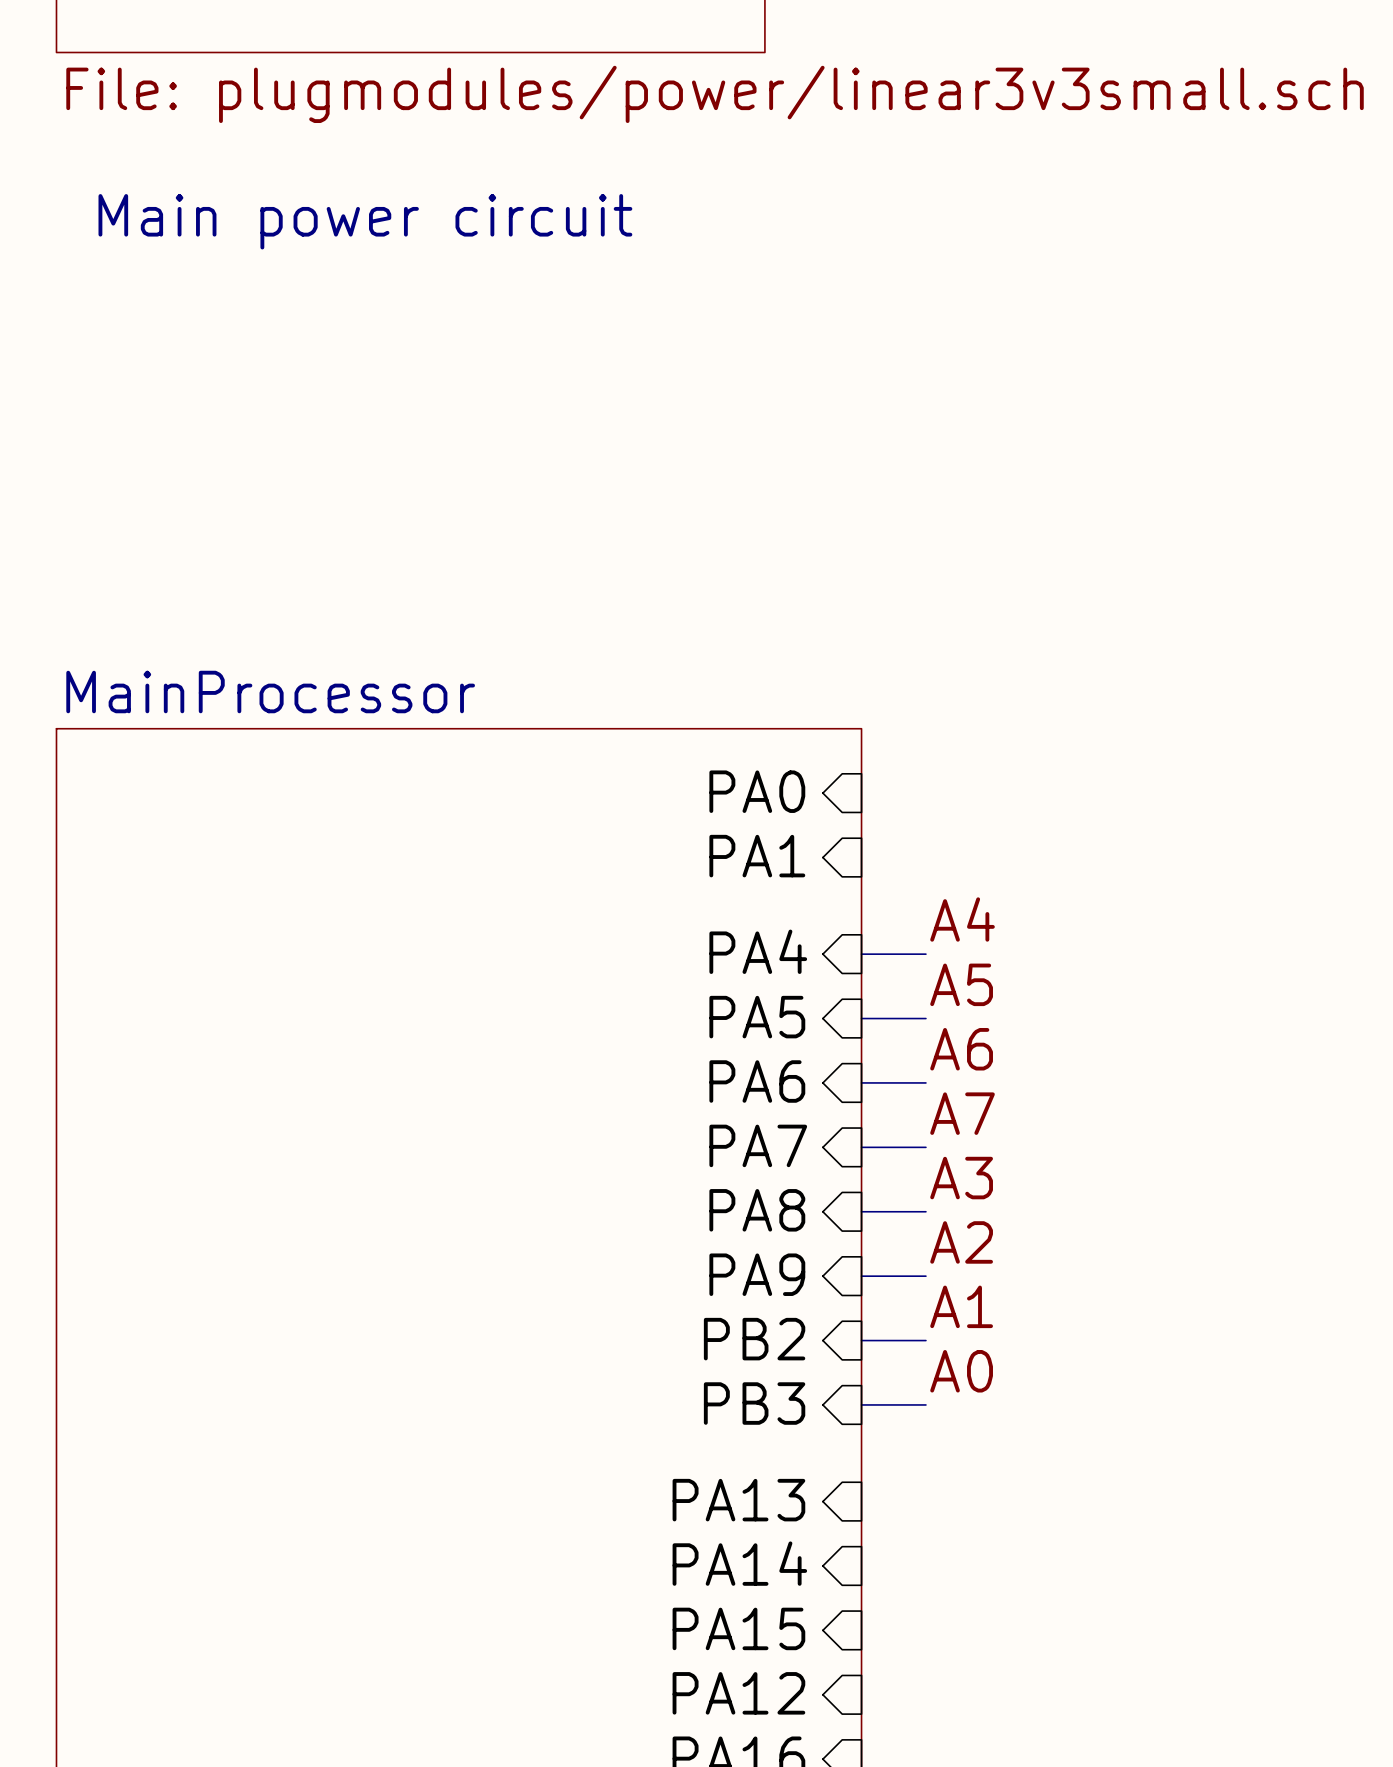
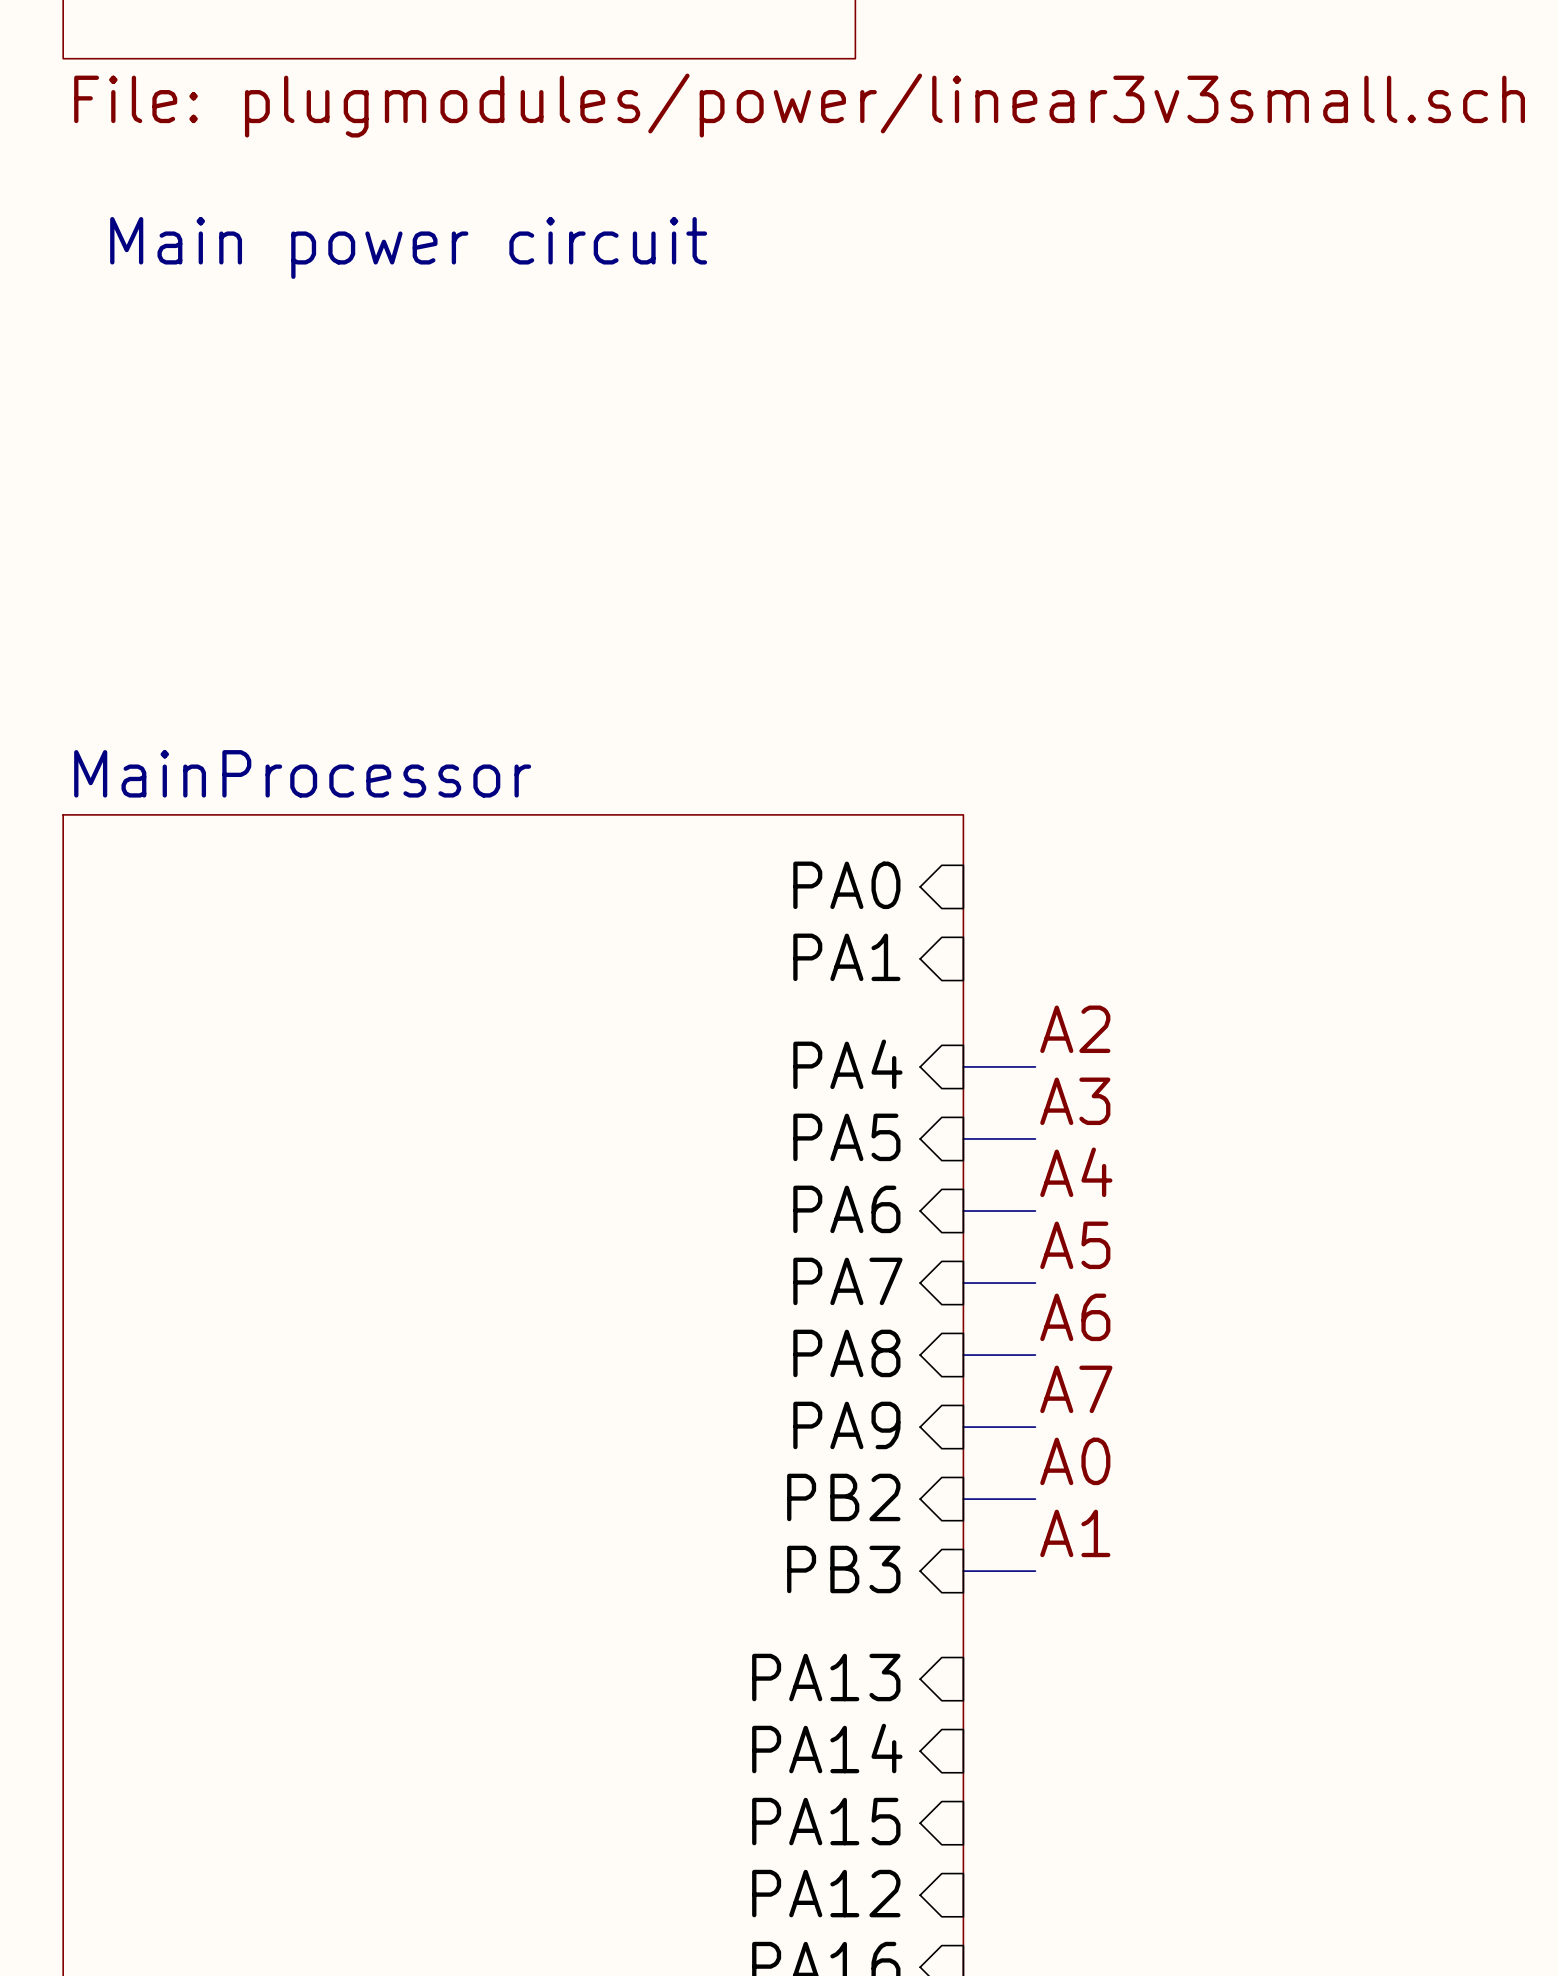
label: A4 (962, 919) -> A2 (1075, 1029)
label: A5 (961, 984) -> A3 (1075, 1101)
label: A6 (961, 1049) -> A4 (1076, 1172)
label: A7 (962, 1113) -> A5 (1075, 1245)
label: A3 (961, 1178) -> A6 (1075, 1317)
label: A2 (961, 1242) -> A7 (1076, 1389)
label: A1 (961, 1306) -> A0 (1075, 1461)
label: A0 (961, 1371) -> A1 (1075, 1533)

